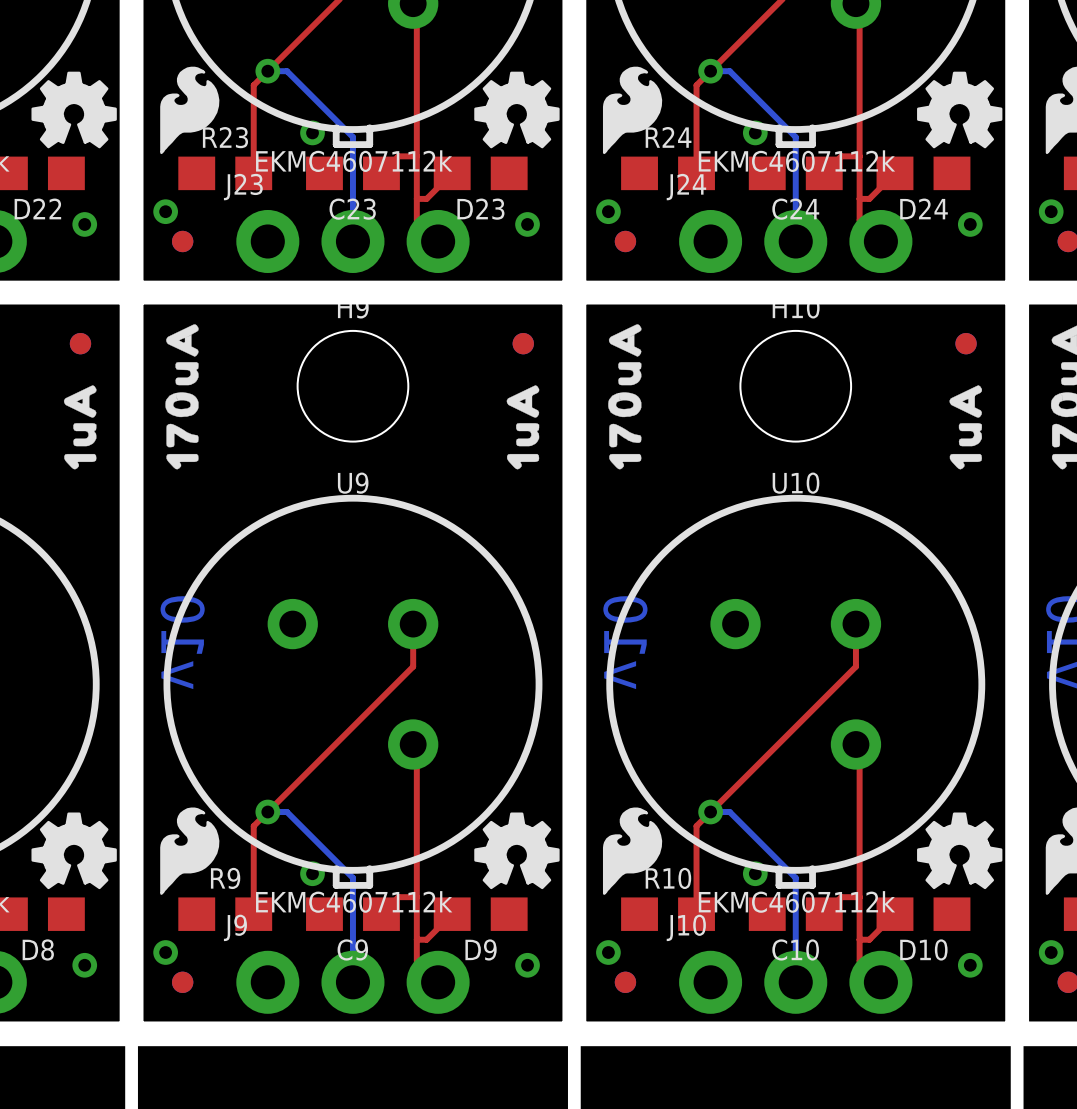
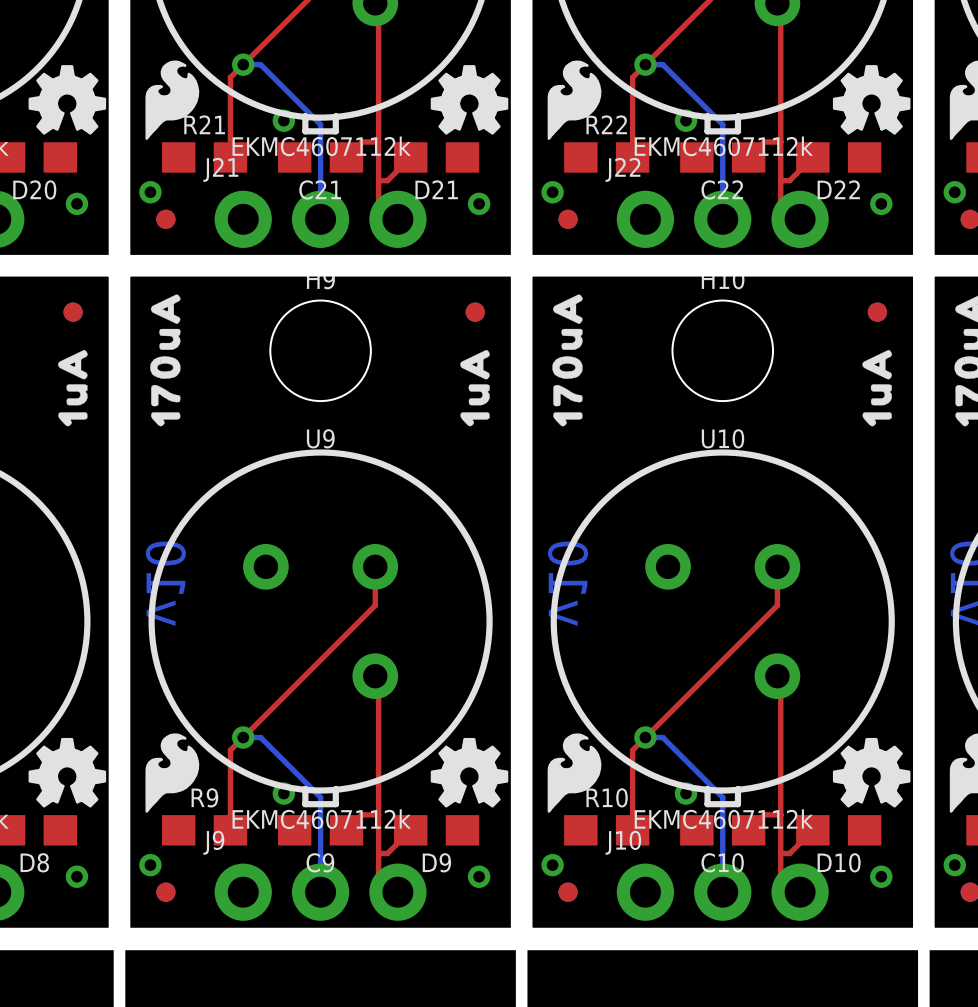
R23 name: R23 (225, 137) -> R21 (204, 124)
R24 name: R24 (668, 137) -> R22 (606, 124)
J23 name: J23 (243, 187) -> J21 (220, 169)
J24 name: J24 (686, 187) -> J22 (622, 169)
D22 name: D22 (37, 208) -> D20 (34, 189)
D24 name: D24 (924, 208) -> D22 (838, 189)
C23 name: C23 (352, 209) -> C21 (320, 189)
D23 name: D23 (480, 209) -> D21 (436, 189)
C24 name: C24 (795, 209) -> C22 (722, 189)

